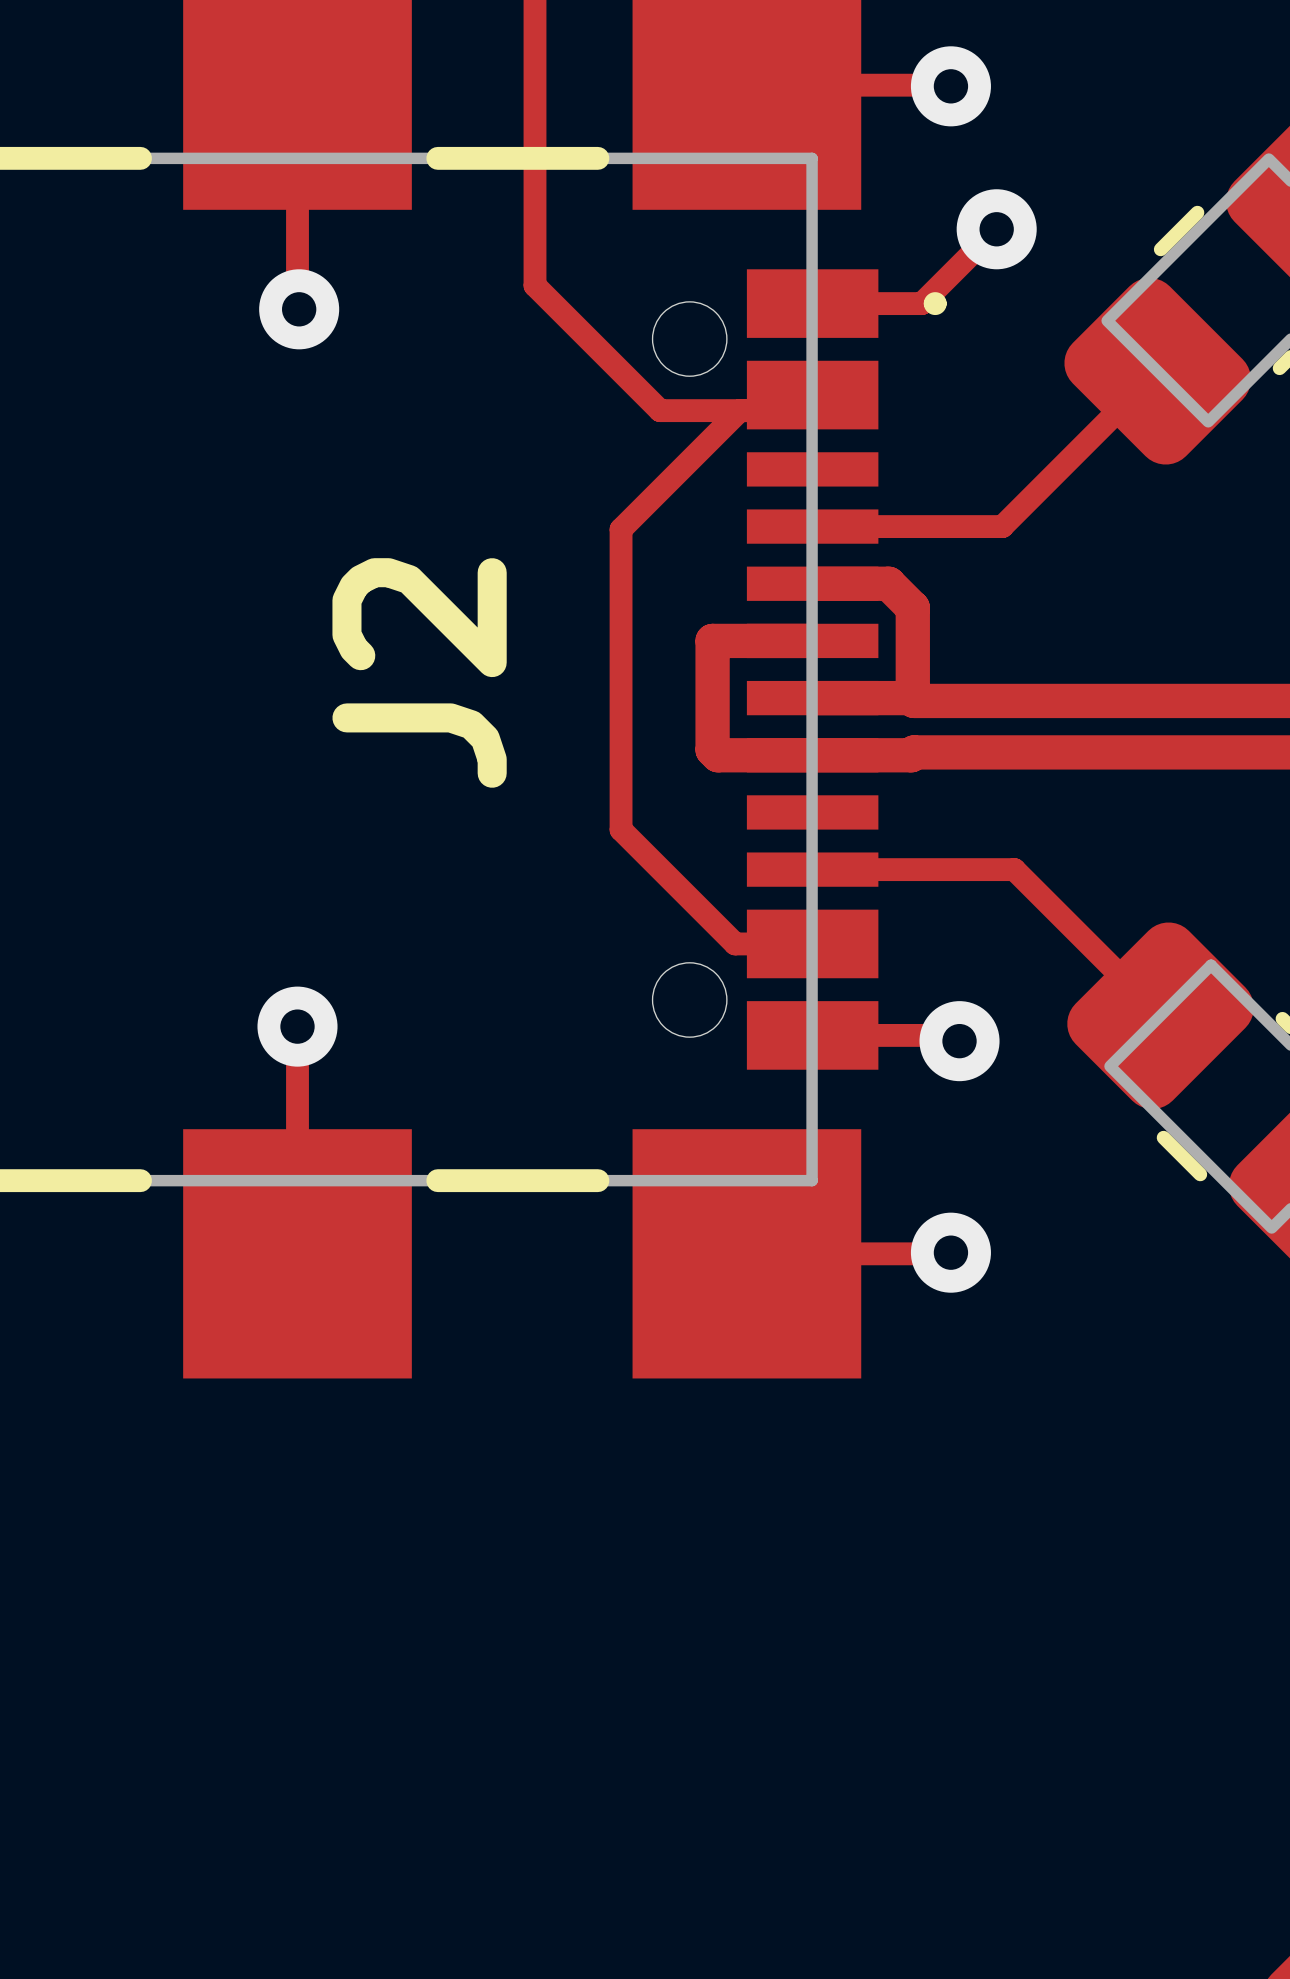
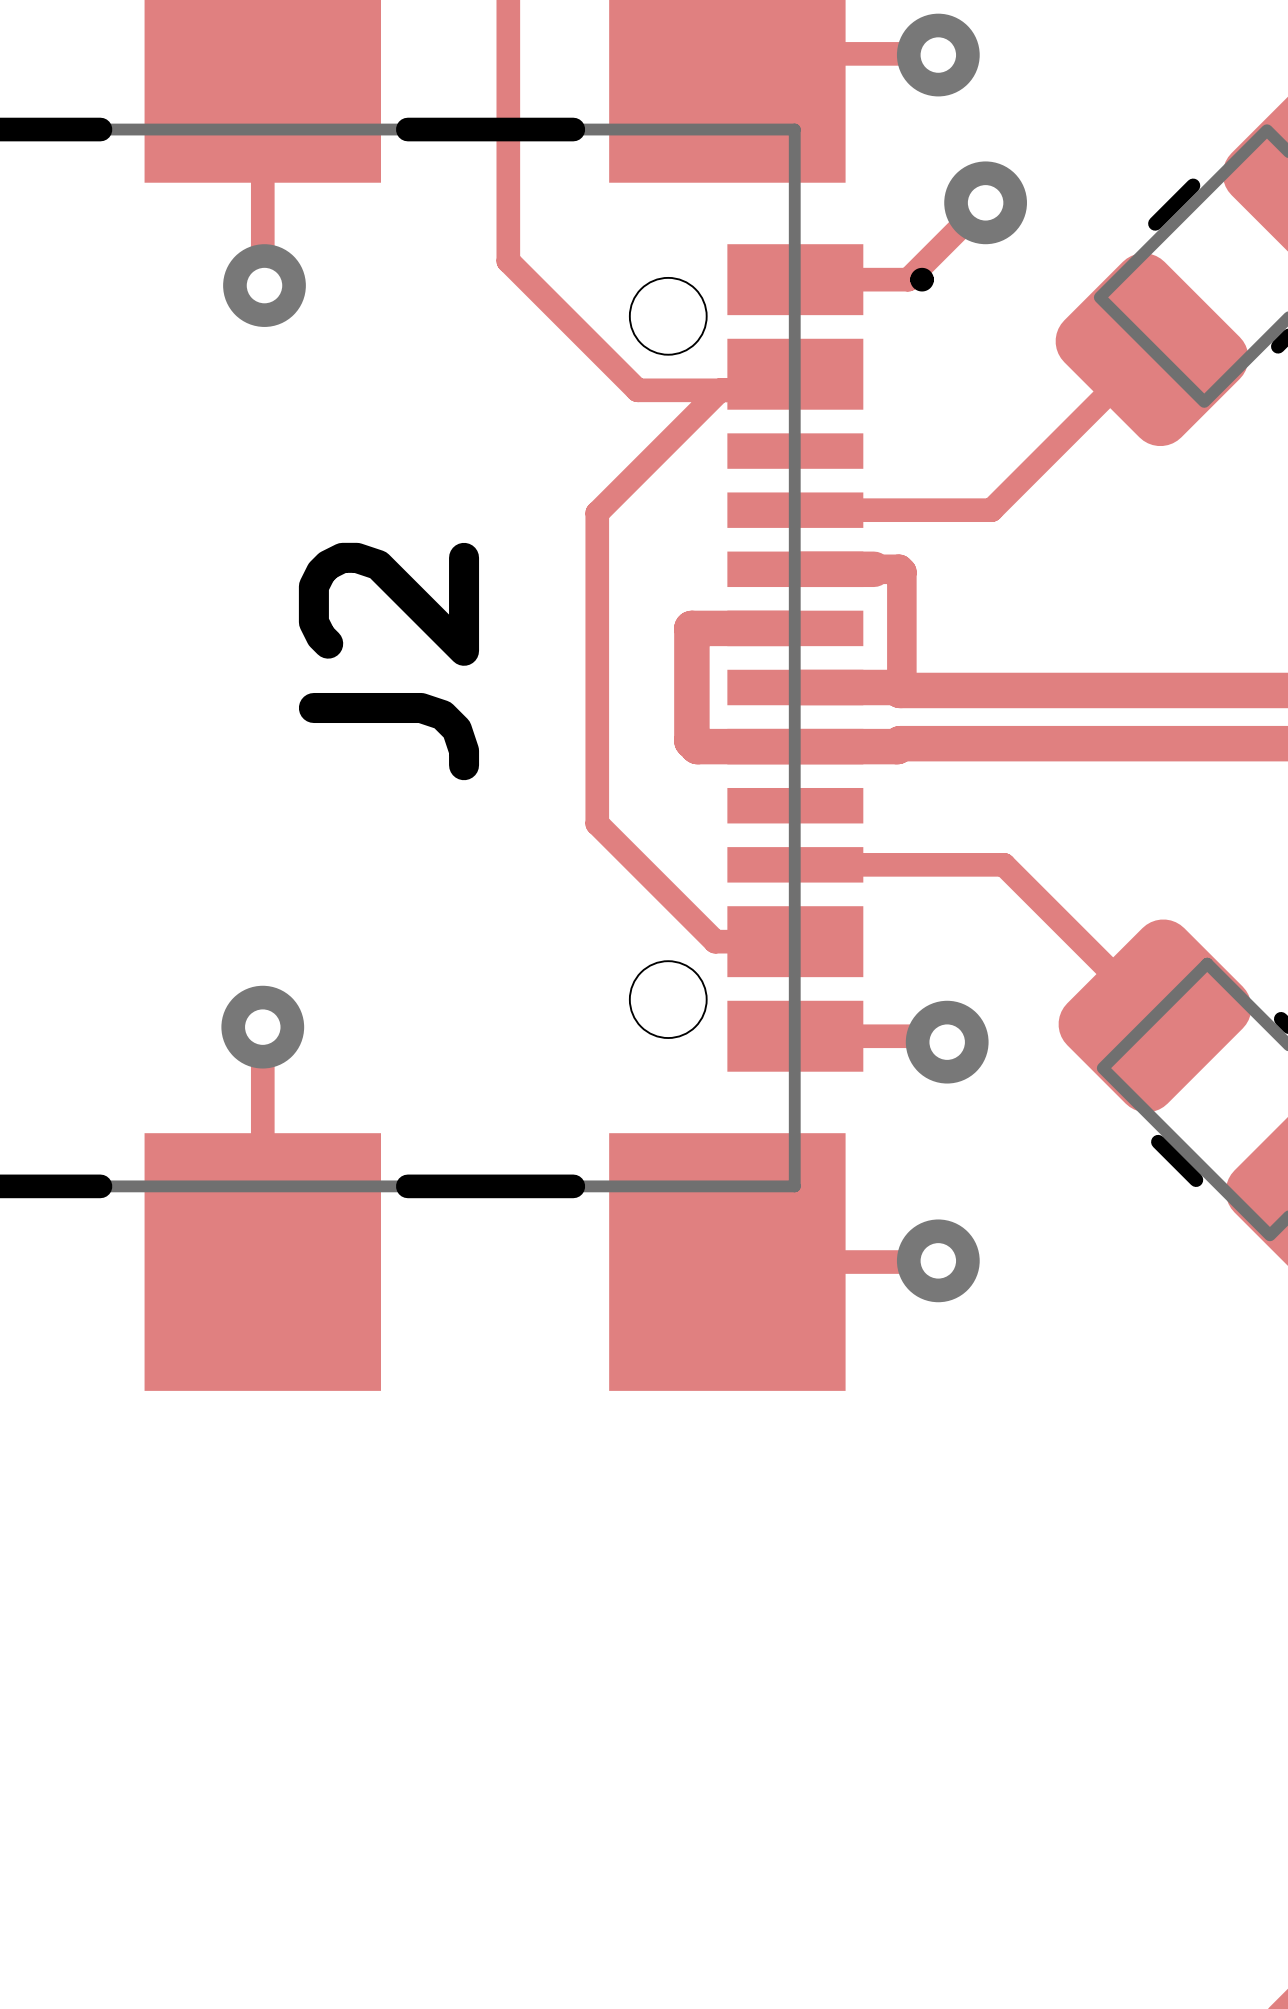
top track: (888, 583) (912, 607) (912, 696) -> (873, 569) (899, 569) (901, 572) (901, 684) (899, 687)

